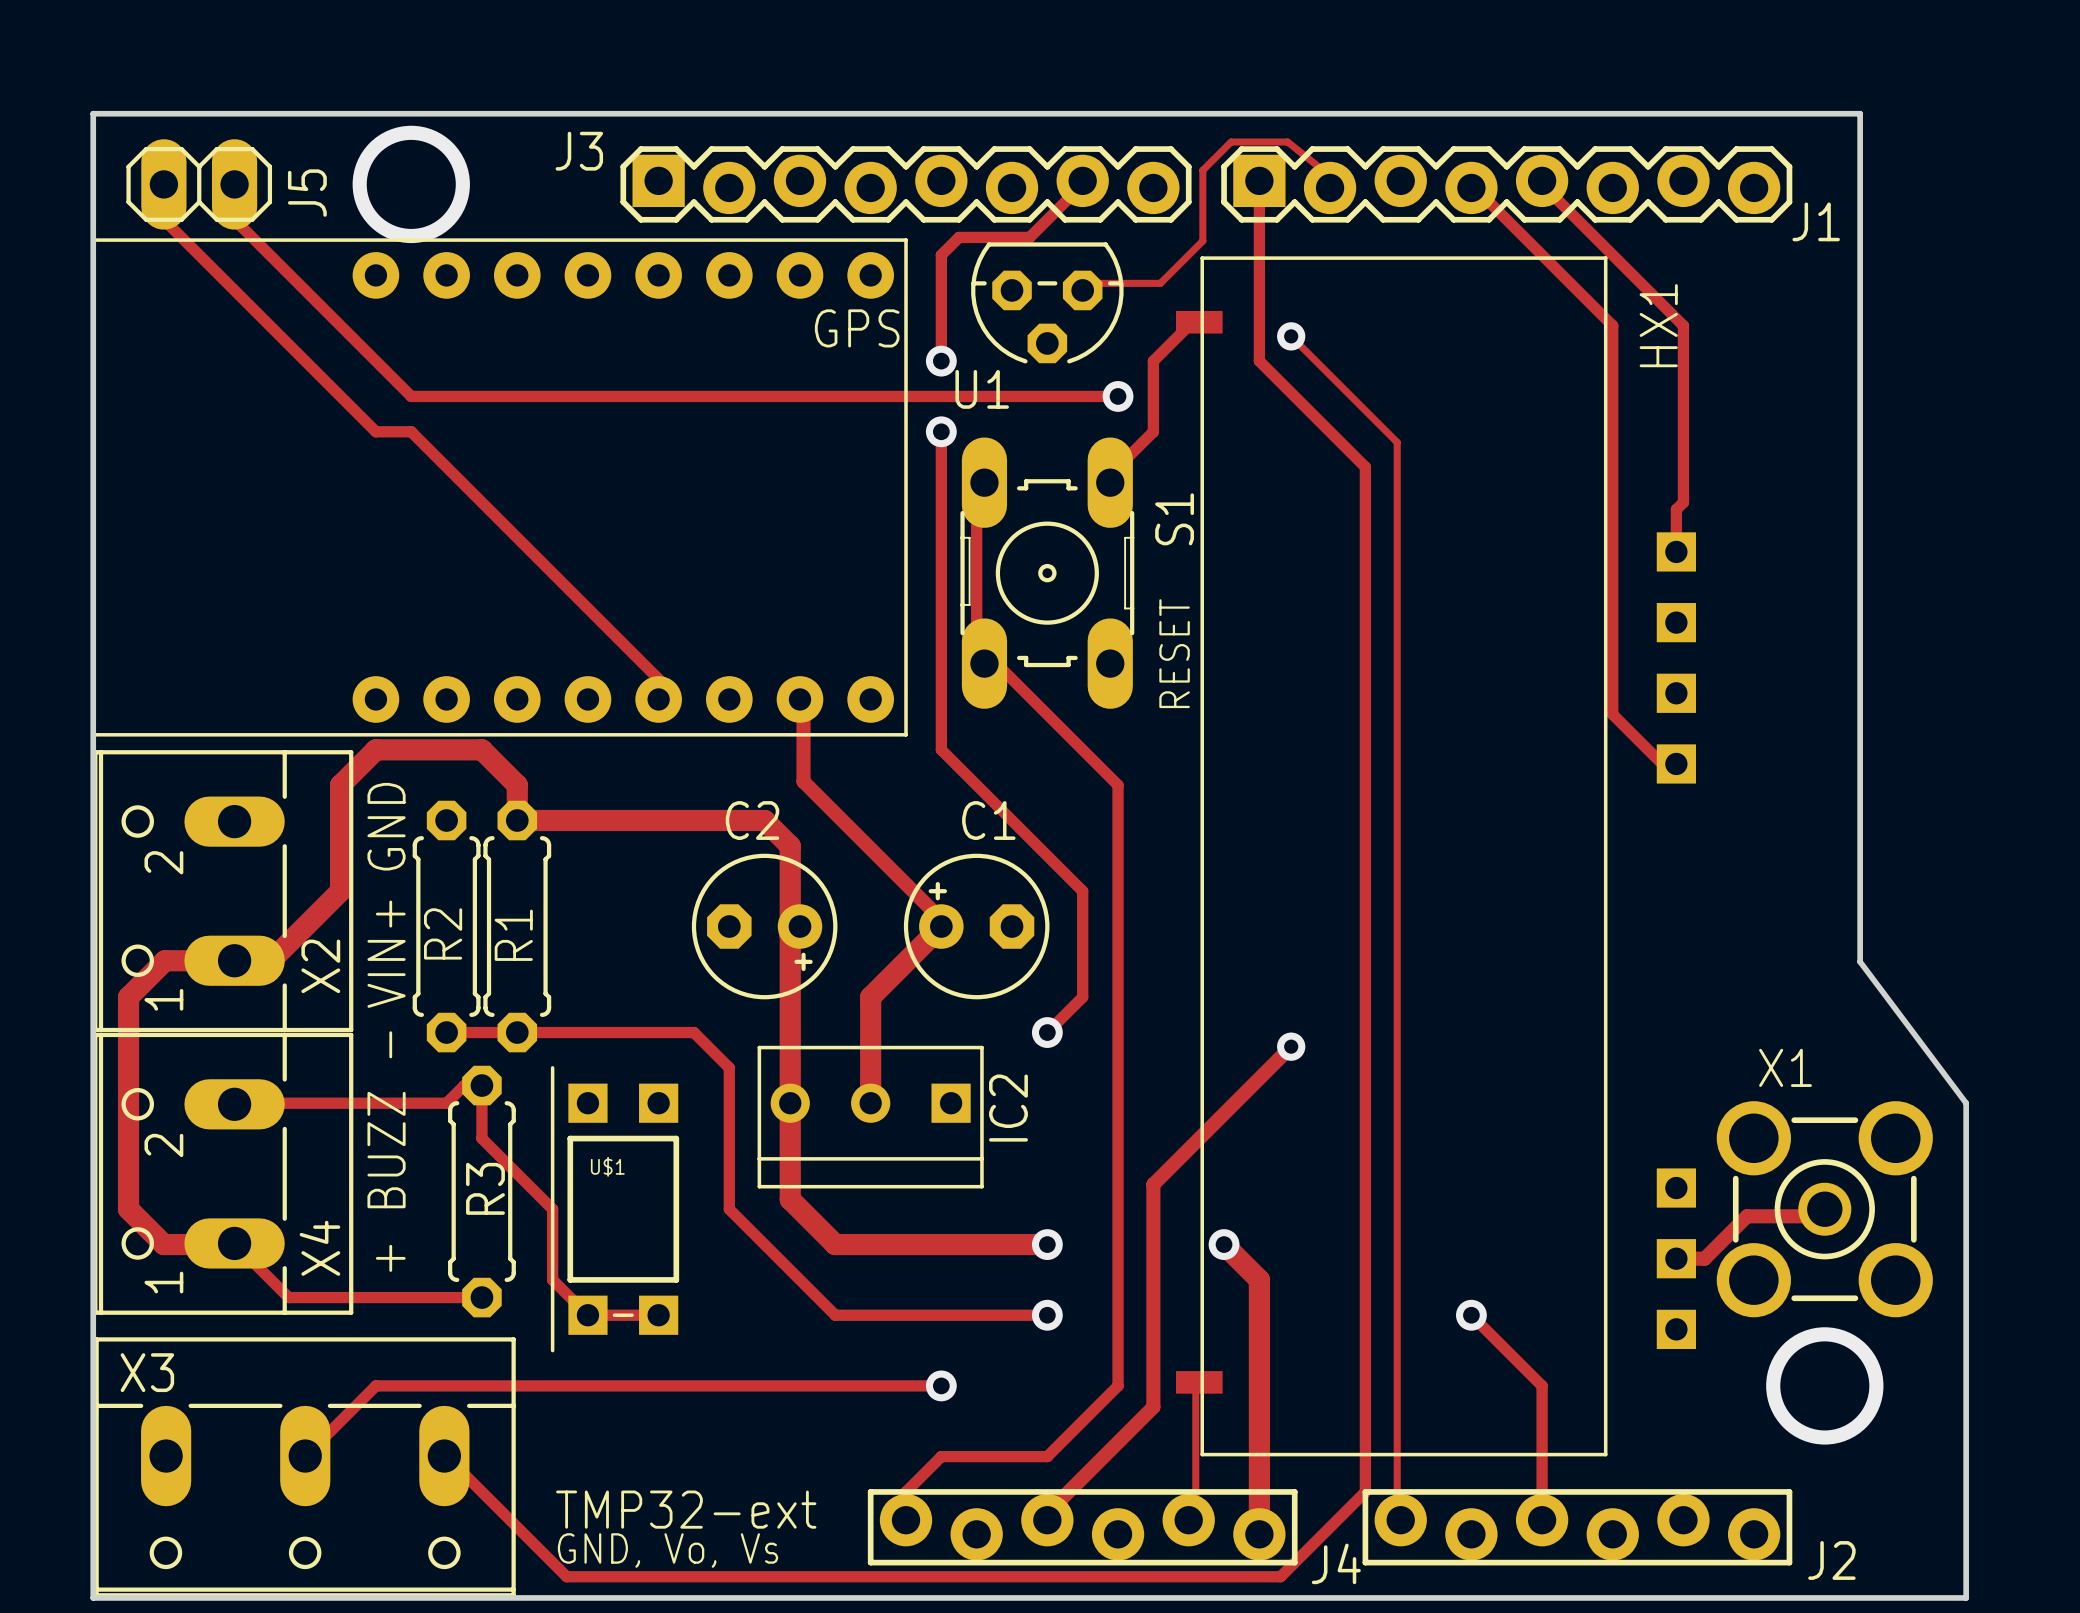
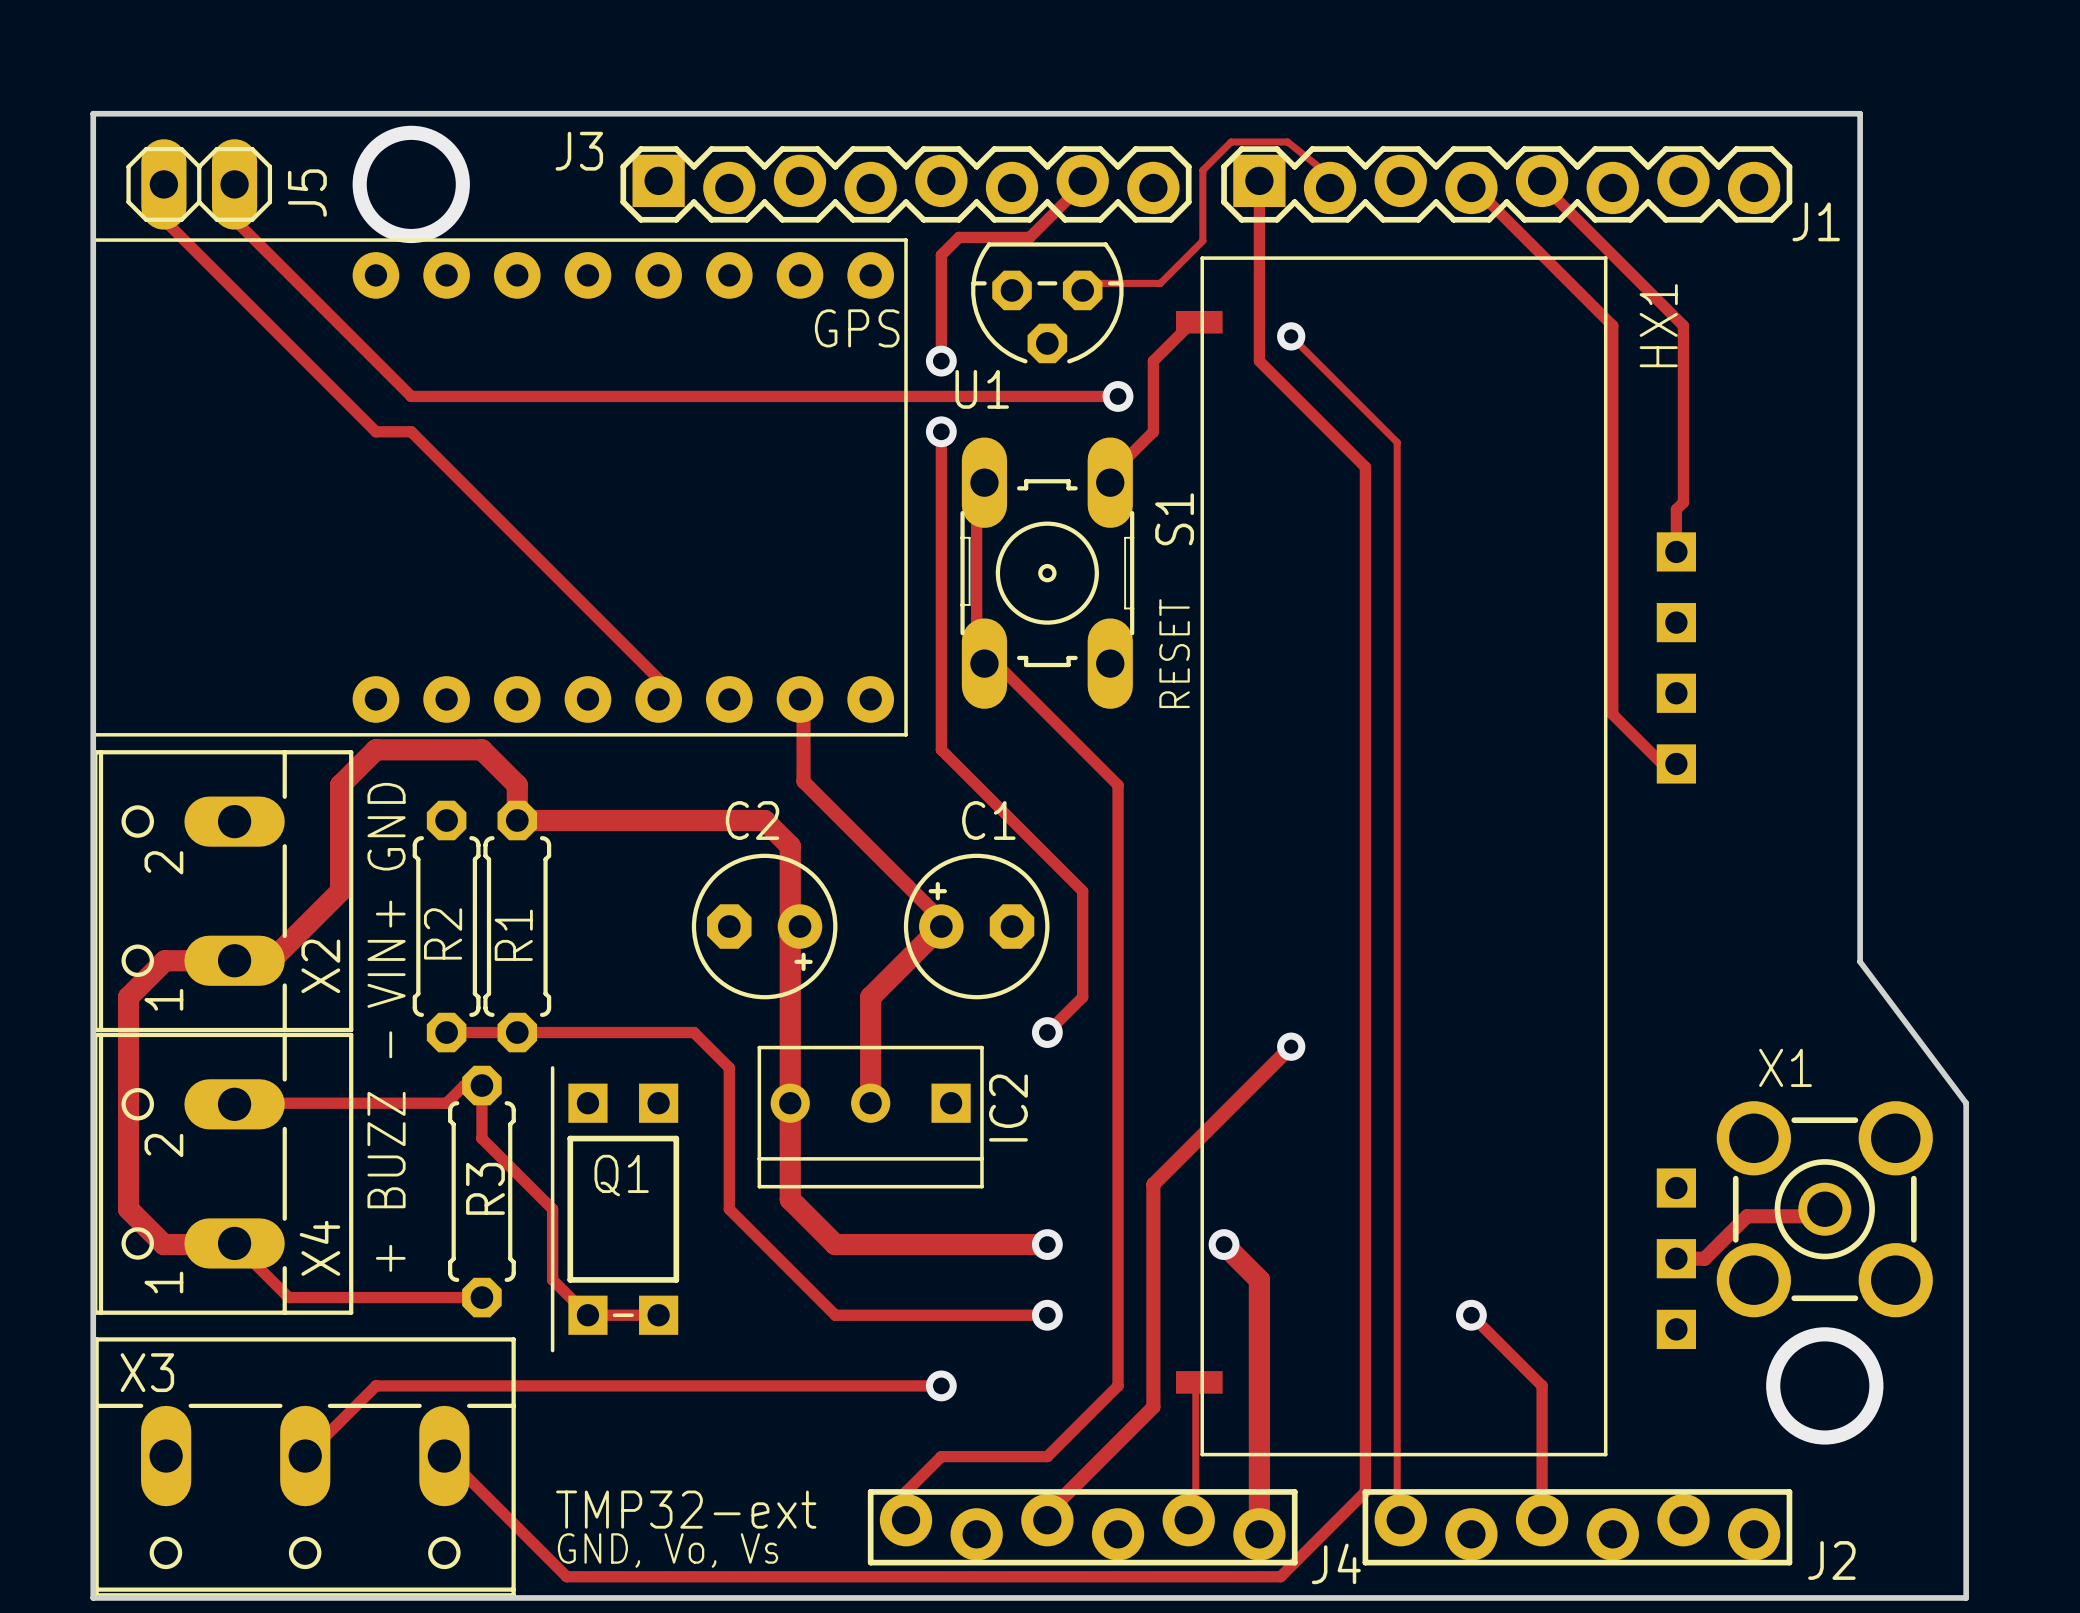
U$1 name: U$1 (607, 1166) -> Q1 (621, 1175)

